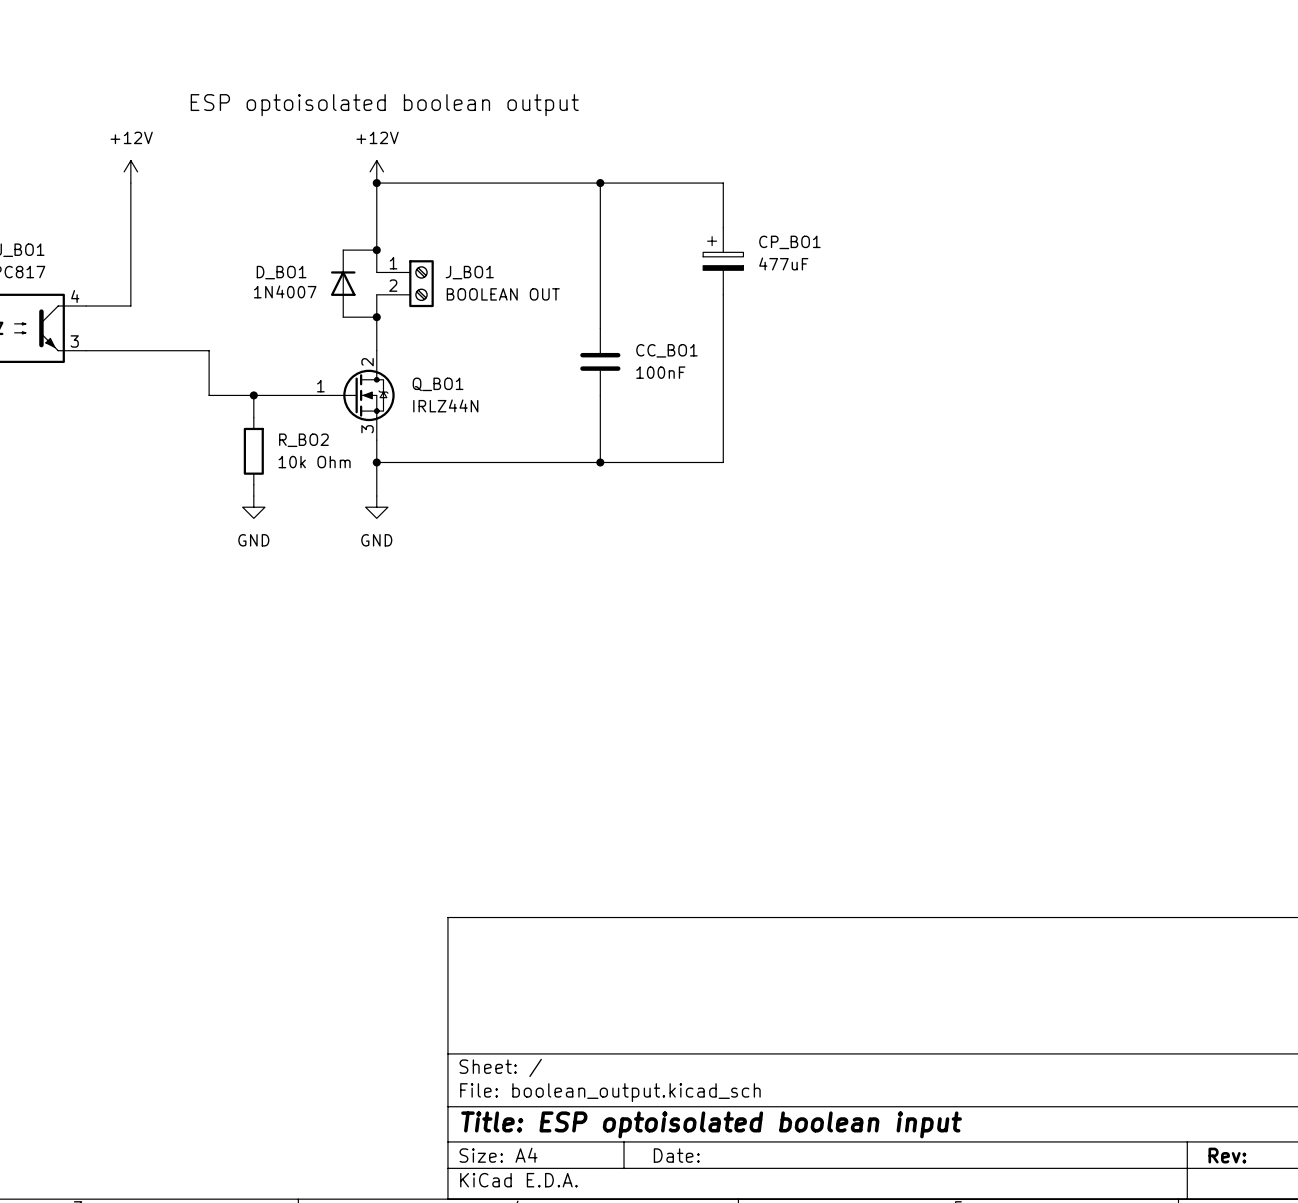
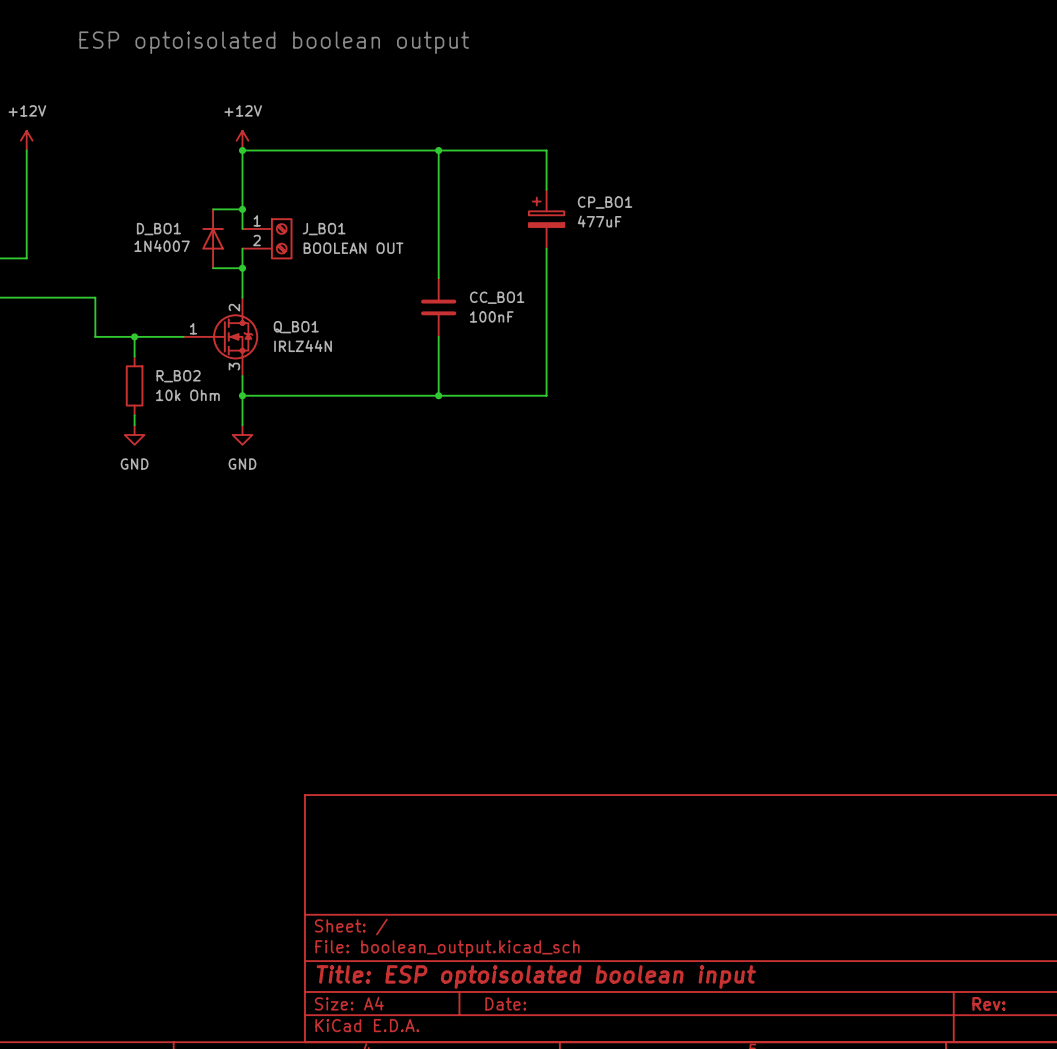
text: none -> ESP optoisolated boolean output (274, 42)
label: ESP optoisolated boolean output (384, 105) -> none

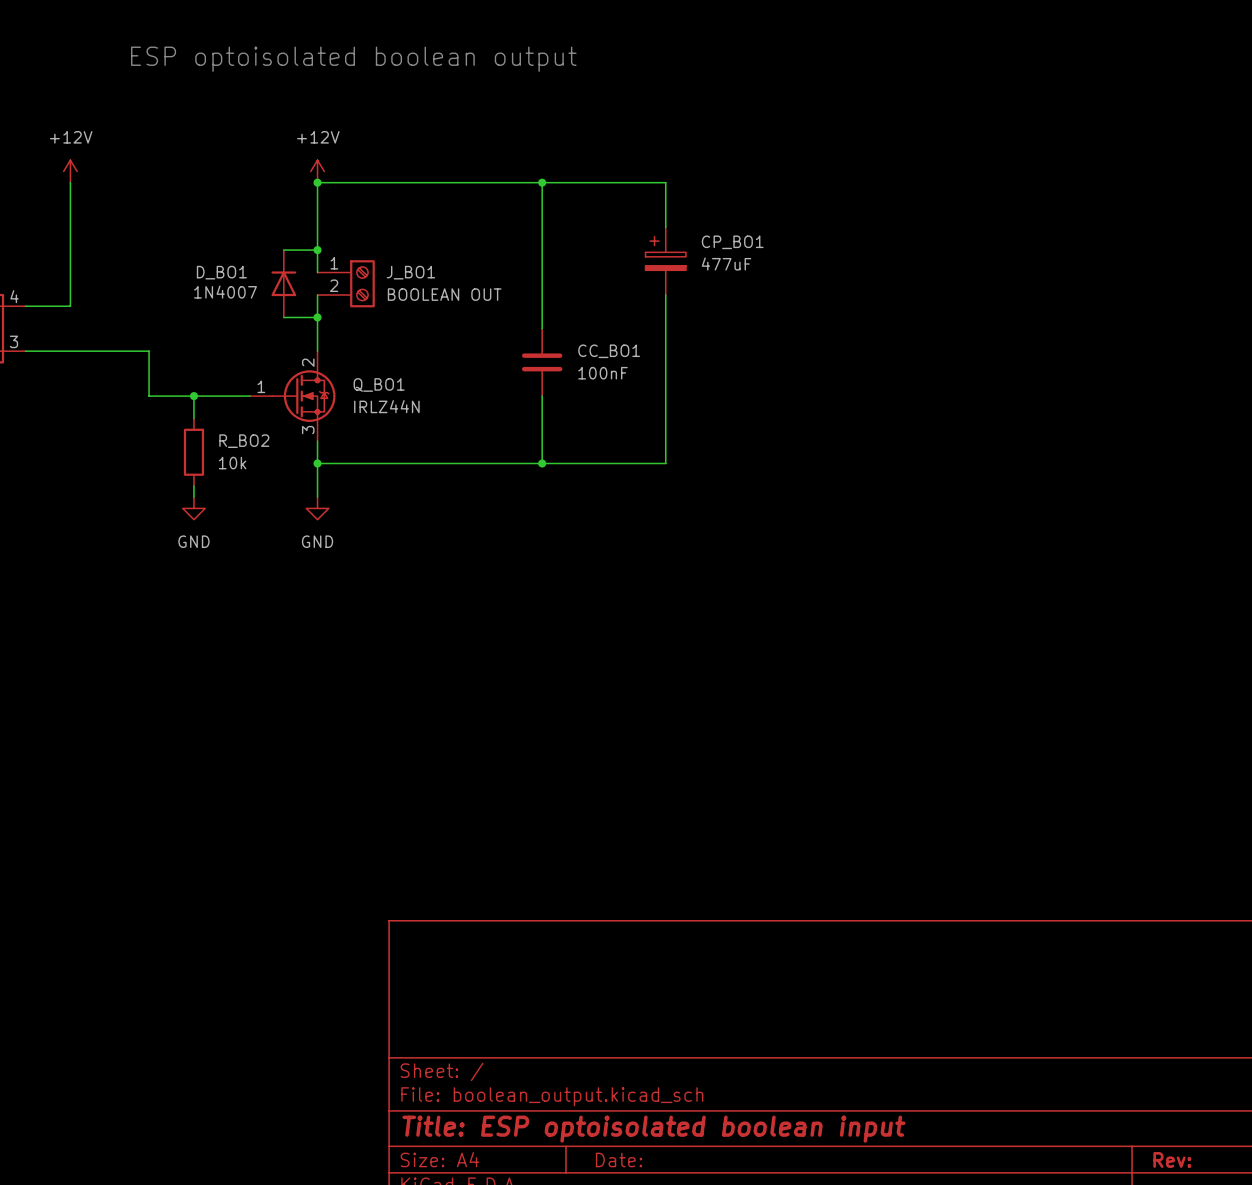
R_BO2 value: 10k Ohm (187, 395) -> 10k (232, 463)

